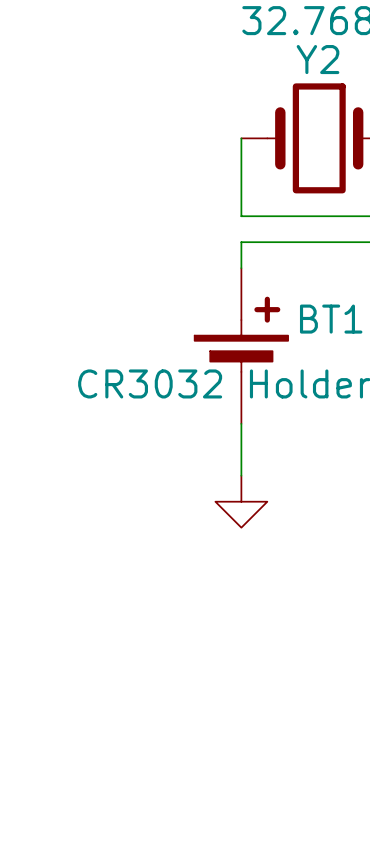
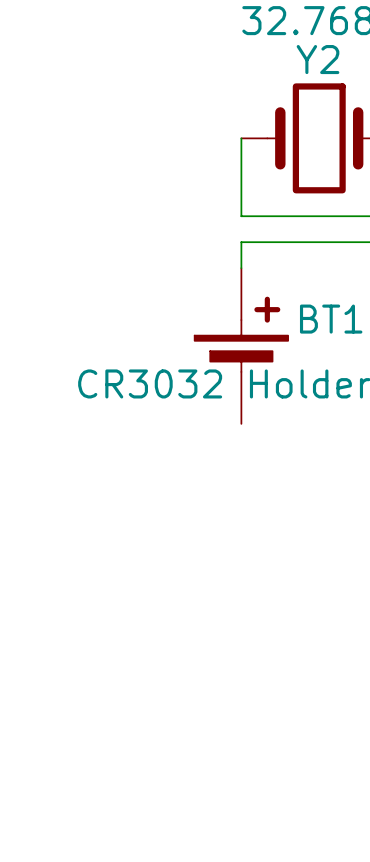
wire: (241, 423) (241, 475) -> none
power symbol: (241, 501) -> none

